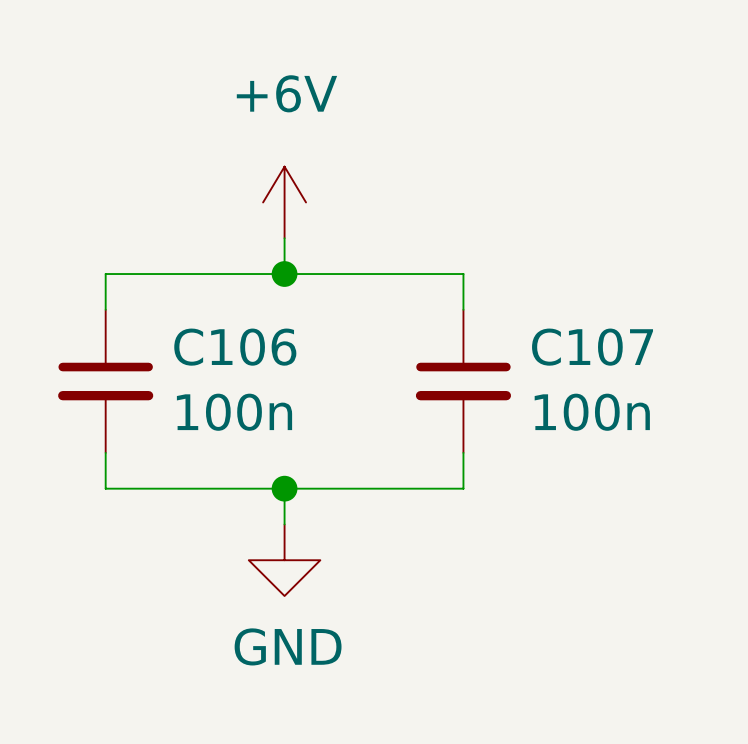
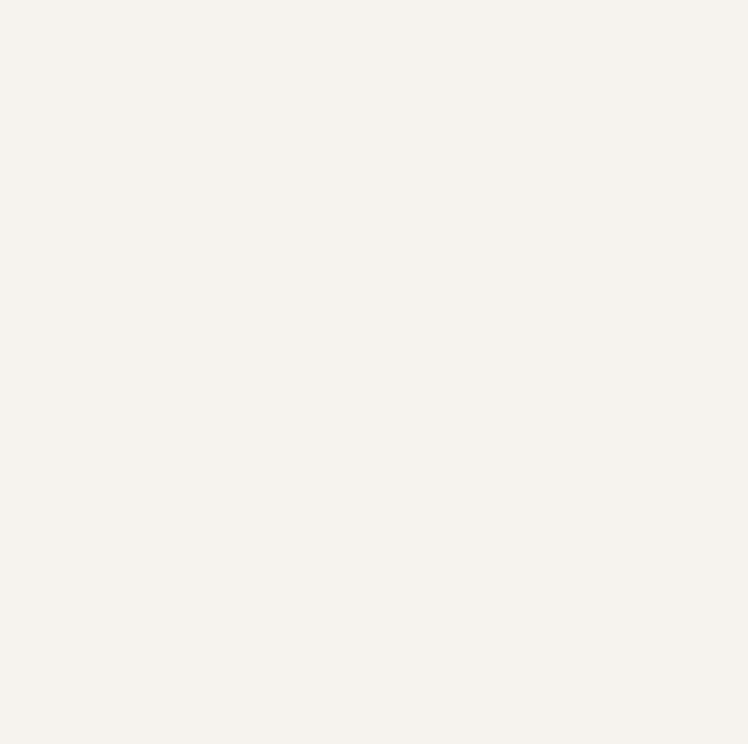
power symbol: +6V (284, 202) -> none
wire: (284, 238) (284, 274) -> none
junction: (284, 274) -> none
wire: (105, 309) (105, 274) (463, 274) (463, 309) -> none
C106: 100n (105, 381) -> none
C107: 100n (463, 381) -> none
wire: (105, 452) (105, 488) (463, 488) (463, 452) -> none
wire: (284, 488) (284, 524) -> none
junction: (284, 488) -> none
power symbol: GND (284, 560) -> none

